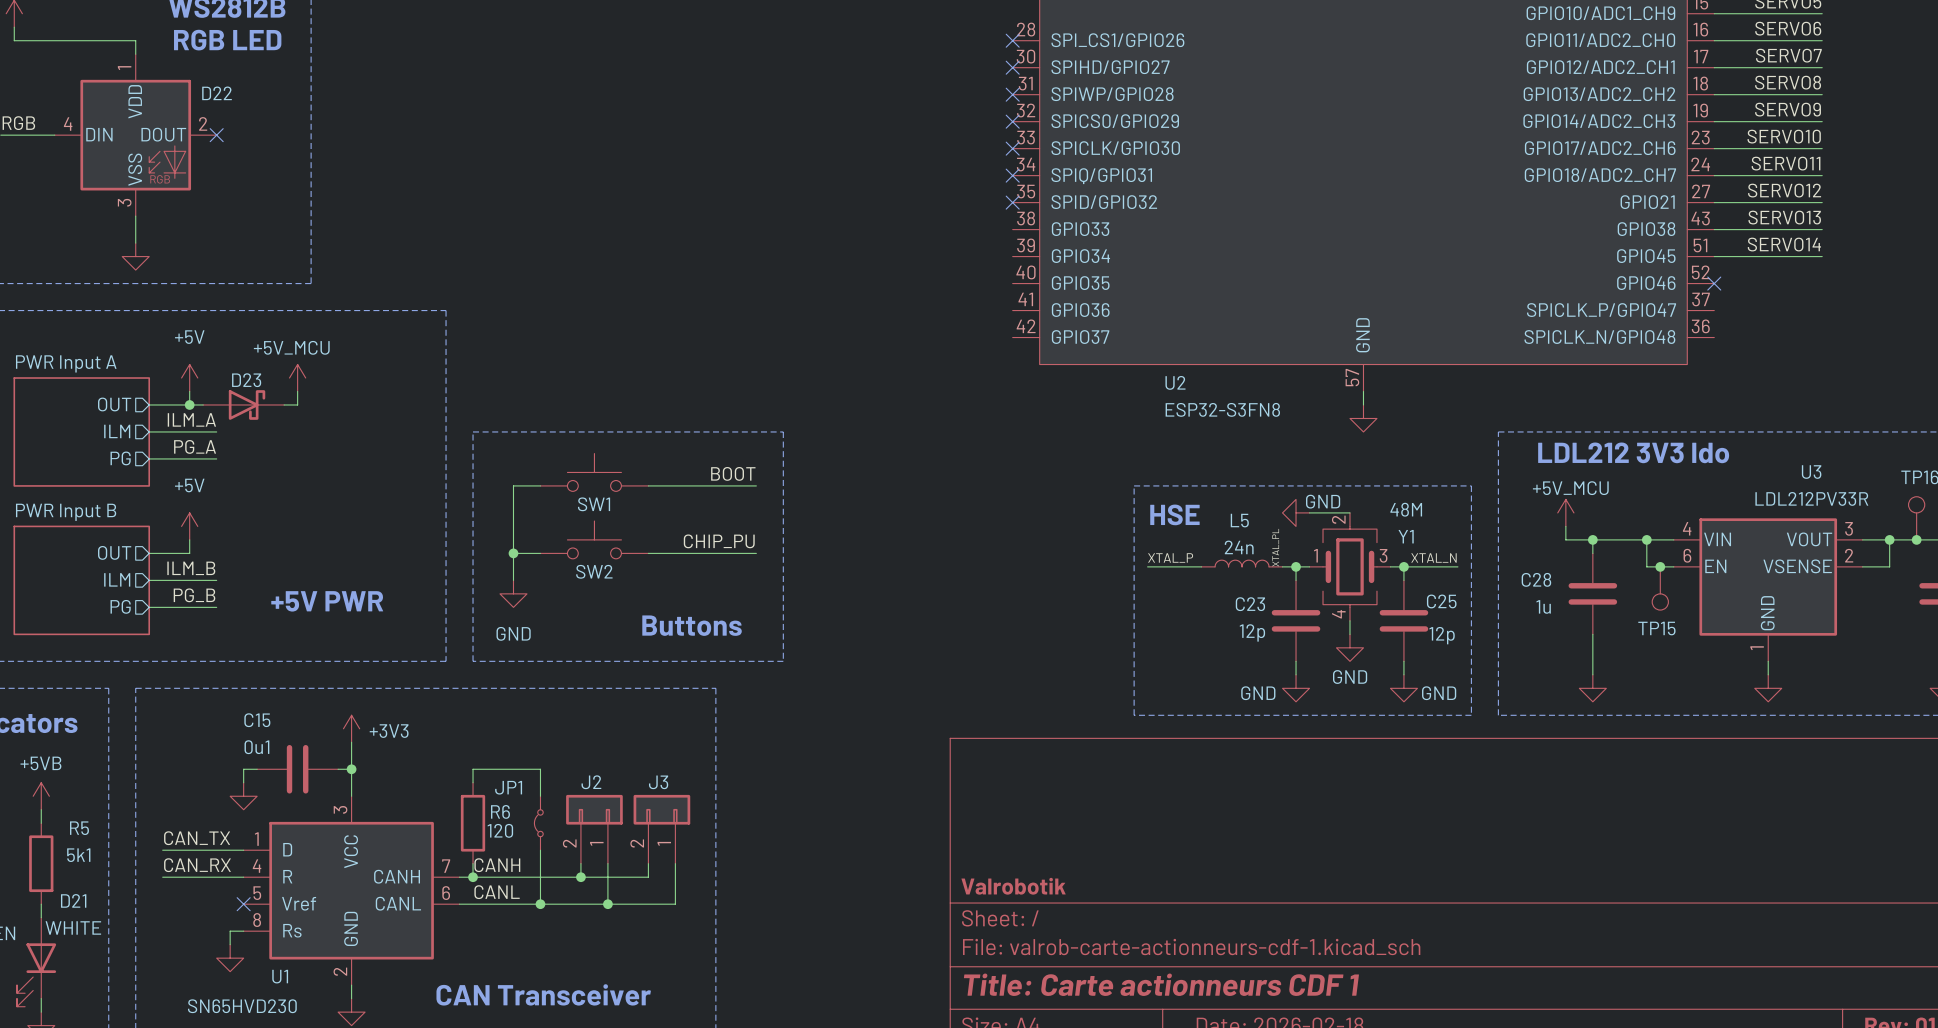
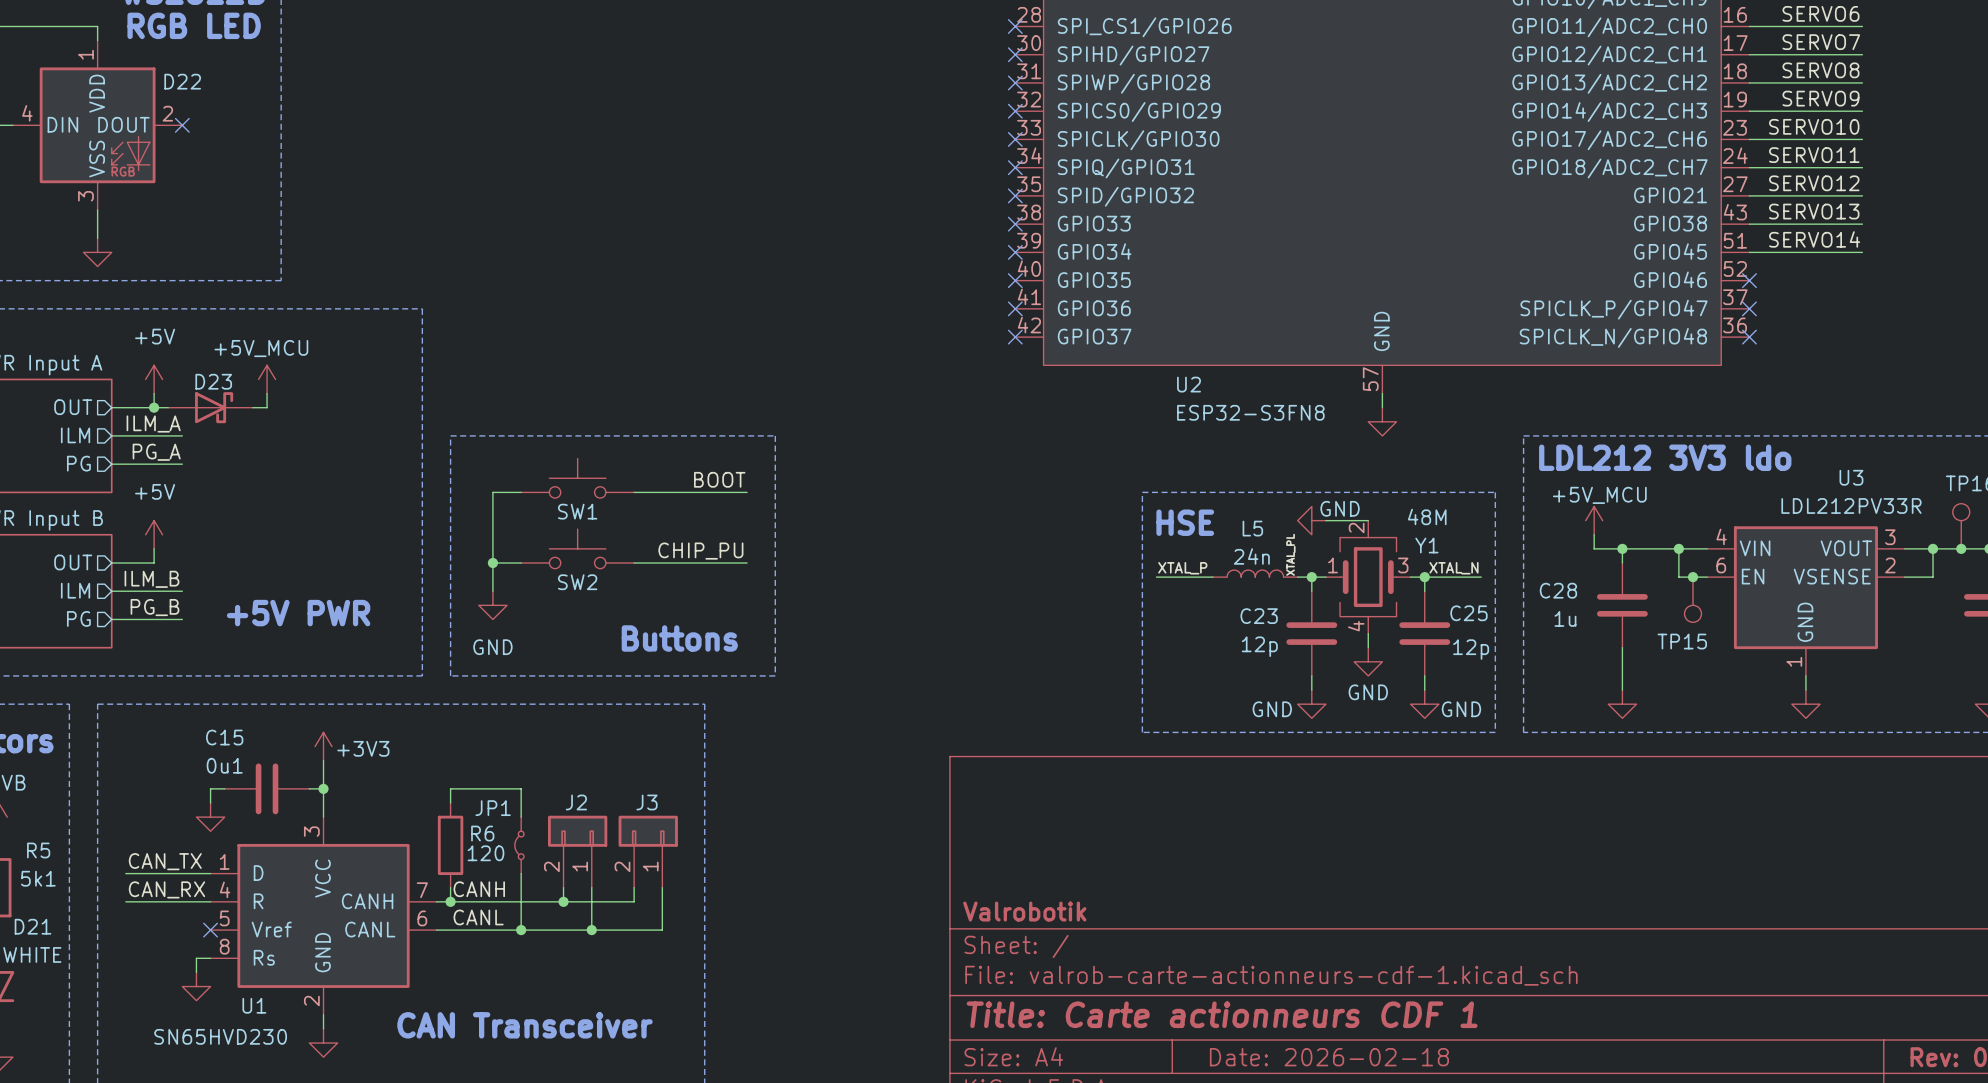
no-connect mark: none -> (1015, 224)
no-connect mark: none -> (1015, 252)
no-connect mark: none -> (1015, 280)
no-connect mark: none -> (1015, 308)
no-connect mark: none -> (1749, 308)
no-connect mark: none -> (1015, 337)
no-connect mark: none -> (1749, 337)

